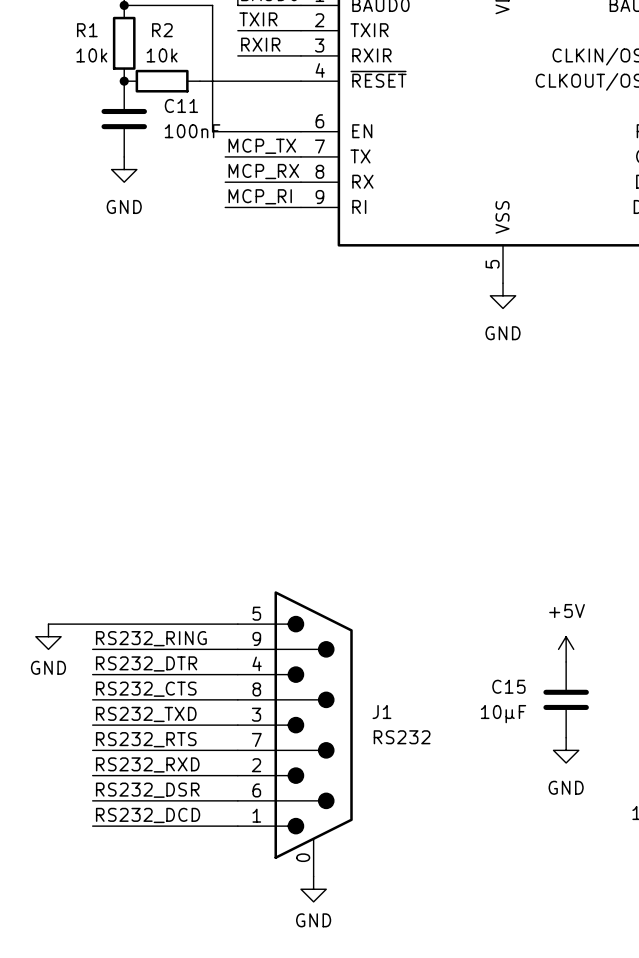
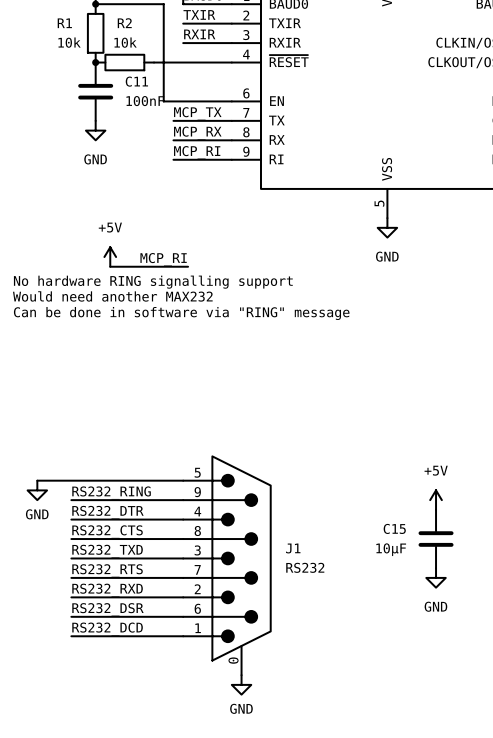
power symbol: none -> +5V (110, 257)
label: none -> MCP_RI (163, 259)
wire: none -> (110, 266) (188, 266)
text: none -> No hardware RING signalling support (153, 282)
text: none -> Would need another MAX232 (112, 296)
text: none -> Can be done in software via "RING" message (181, 313)

